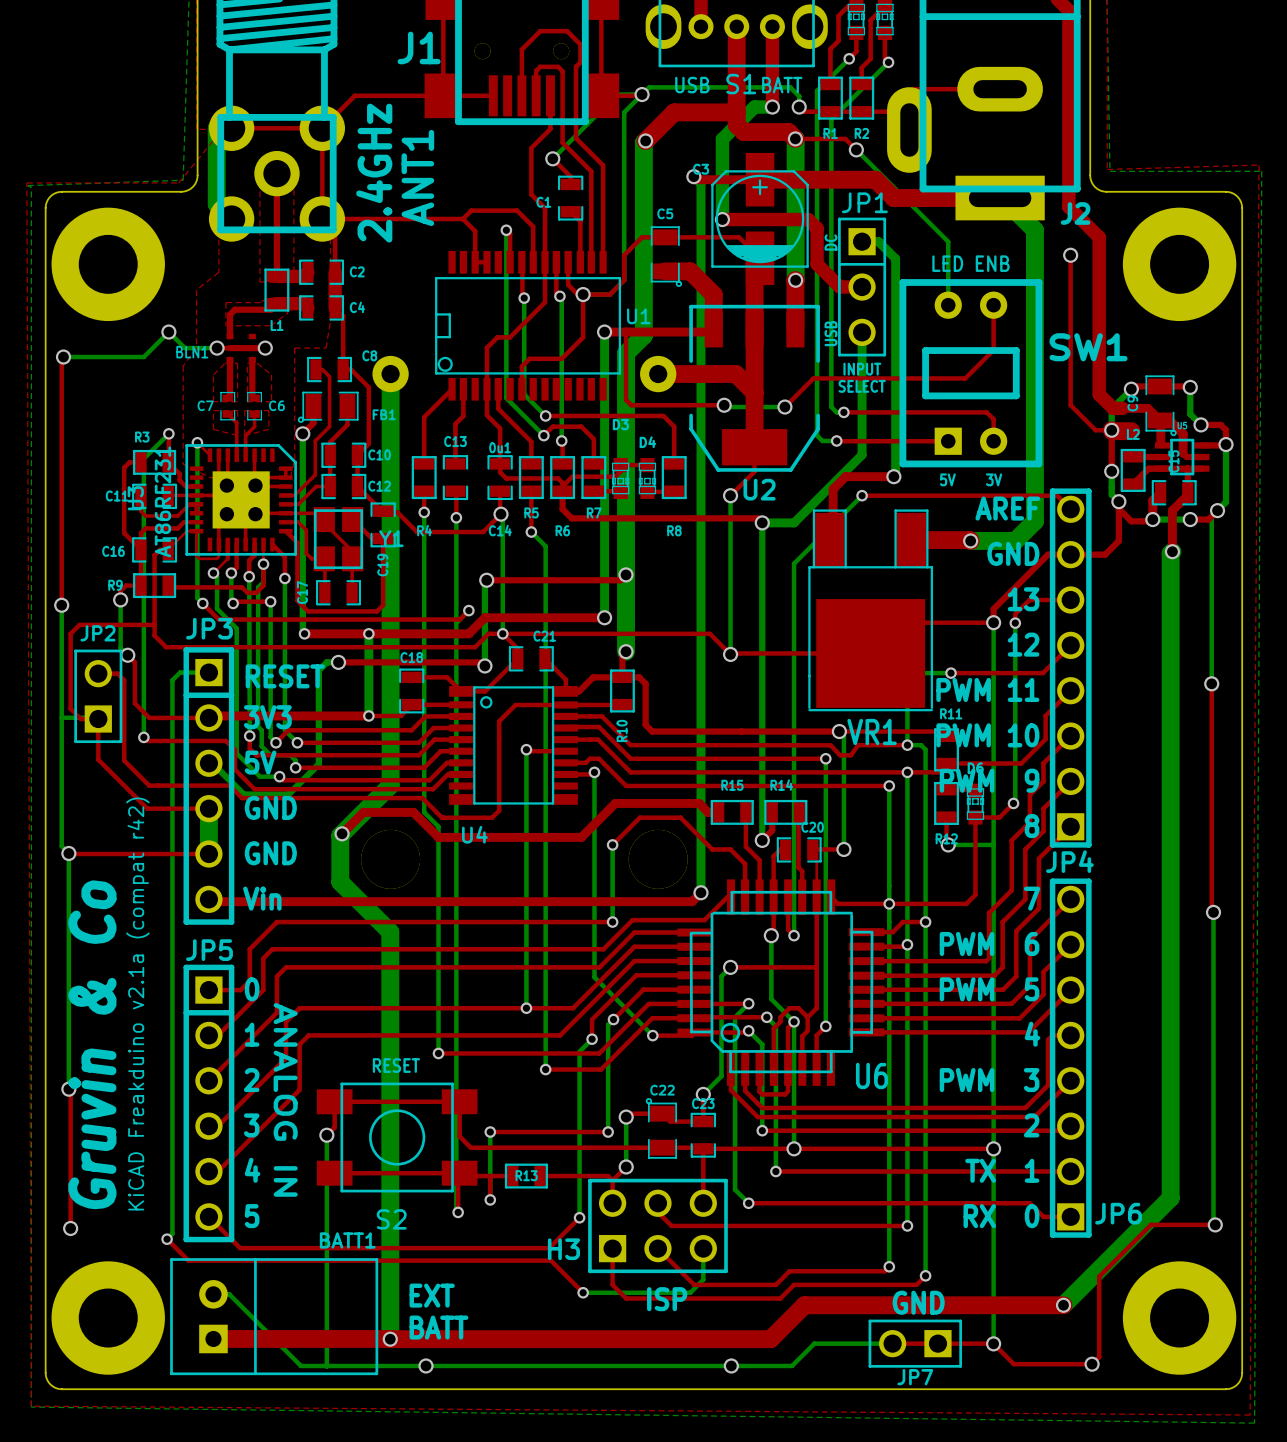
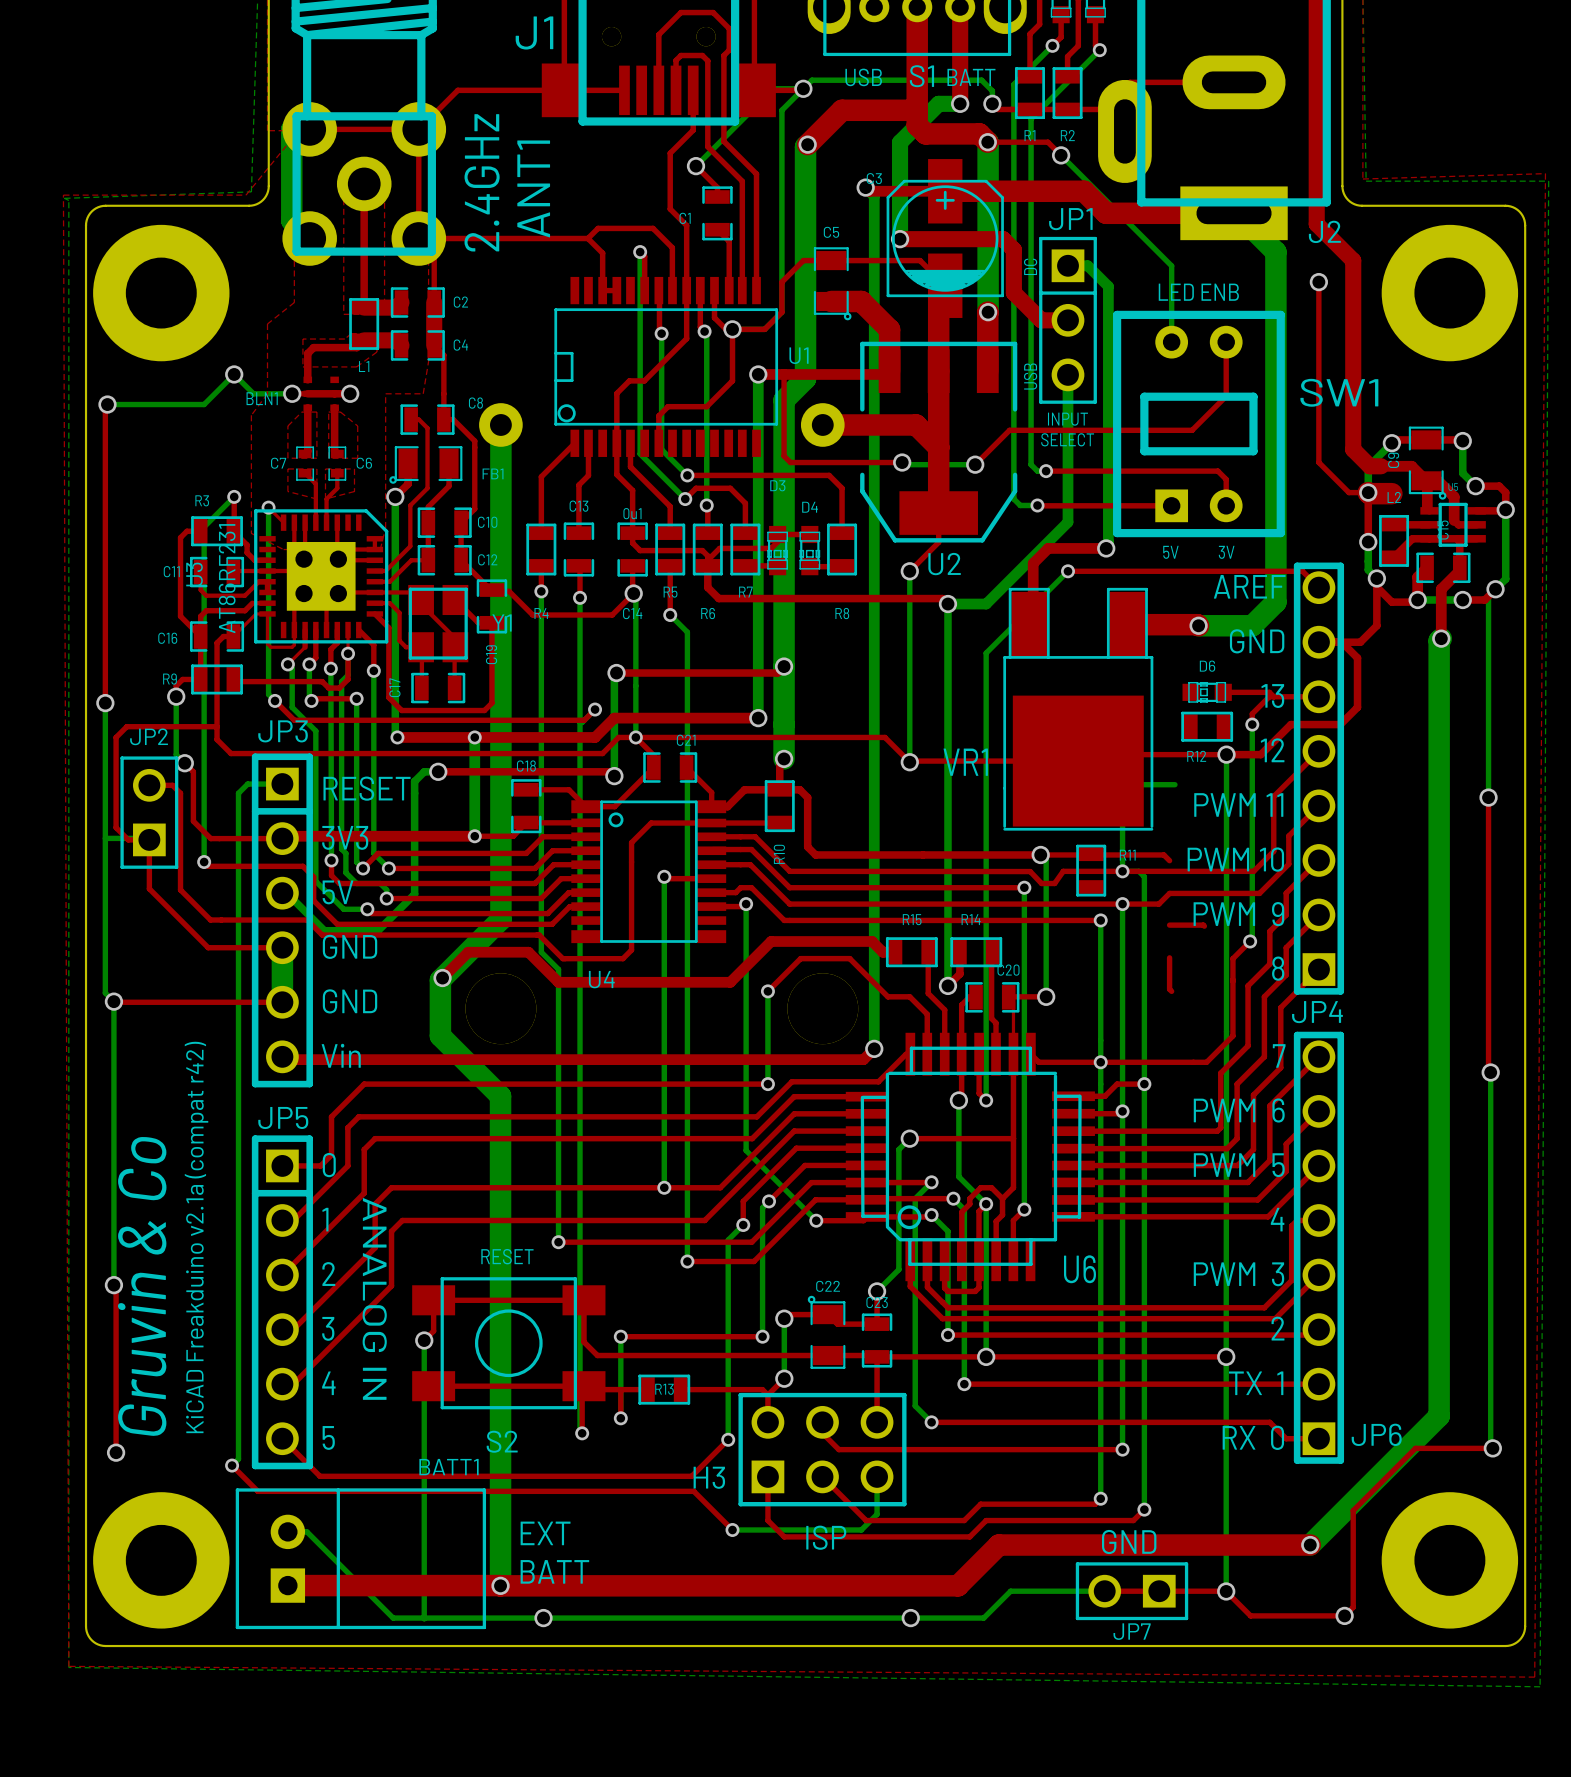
top track: (1070, 554) (1048, 554) (993, 609) (993, 622) -> none
top track: none -> (1341, 642) (1357, 657) (1357, 707) (1340, 724) (1290, 724) (1260, 754) (1226, 754)
top track: none -> (1223, 692) (1269, 692) (1273, 696)
top track: (901, 622) (993, 622) -> none
bottom track: (993, 622) (993, 1148) -> (1226, 754) (1226, 1356)
via position: (993, 622) -> (1226, 754)
top track: none -> (1084, 754) (1226, 754)
top track: (951, 673) (1042, 673) -> (1122, 871) (1253, 871) (1273, 851) (1273, 796) (1285, 784)
via: (951, 673) -> none
R11 name position: R11 (951, 713) -> R11 (1127, 855)
VR1 name position: VR1 (872, 732) -> VR1 (965, 762)
R11 position: (946, 749) -> (1091, 870)
R12 rotation: 0° (946, 803) -> 90° clockwise (1207, 726)
R12 position: (946, 803) -> (1207, 726)
D6 rotation: 0° (975, 804) -> 90° counterclockwise (1207, 692)
D6 position: (975, 804) -> (1207, 692)
top track: (999, 817) (975, 817) (975, 894) (966, 903) -> (1233, 958) (1232, 1036) (1206, 1062) (1193, 1062)
bottom track: (948, 844) (993, 844) -> none
via: (948, 844) -> none

